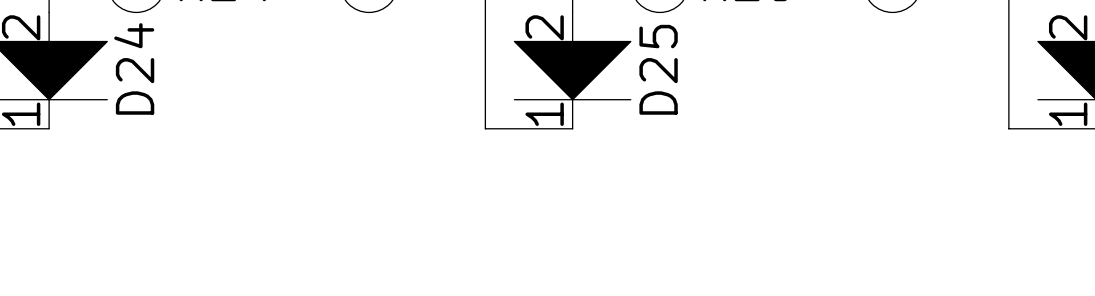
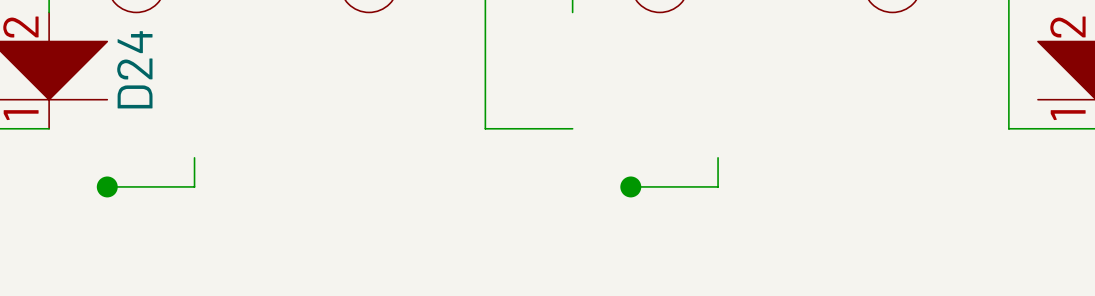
D25: (572, 70) -> none
wire: none -> (194, 157) (194, 186) (107, 186)
wire: none -> (718, 157) (718, 186) (630, 186)
junction: none -> (107, 186)
junction: none -> (630, 186)

